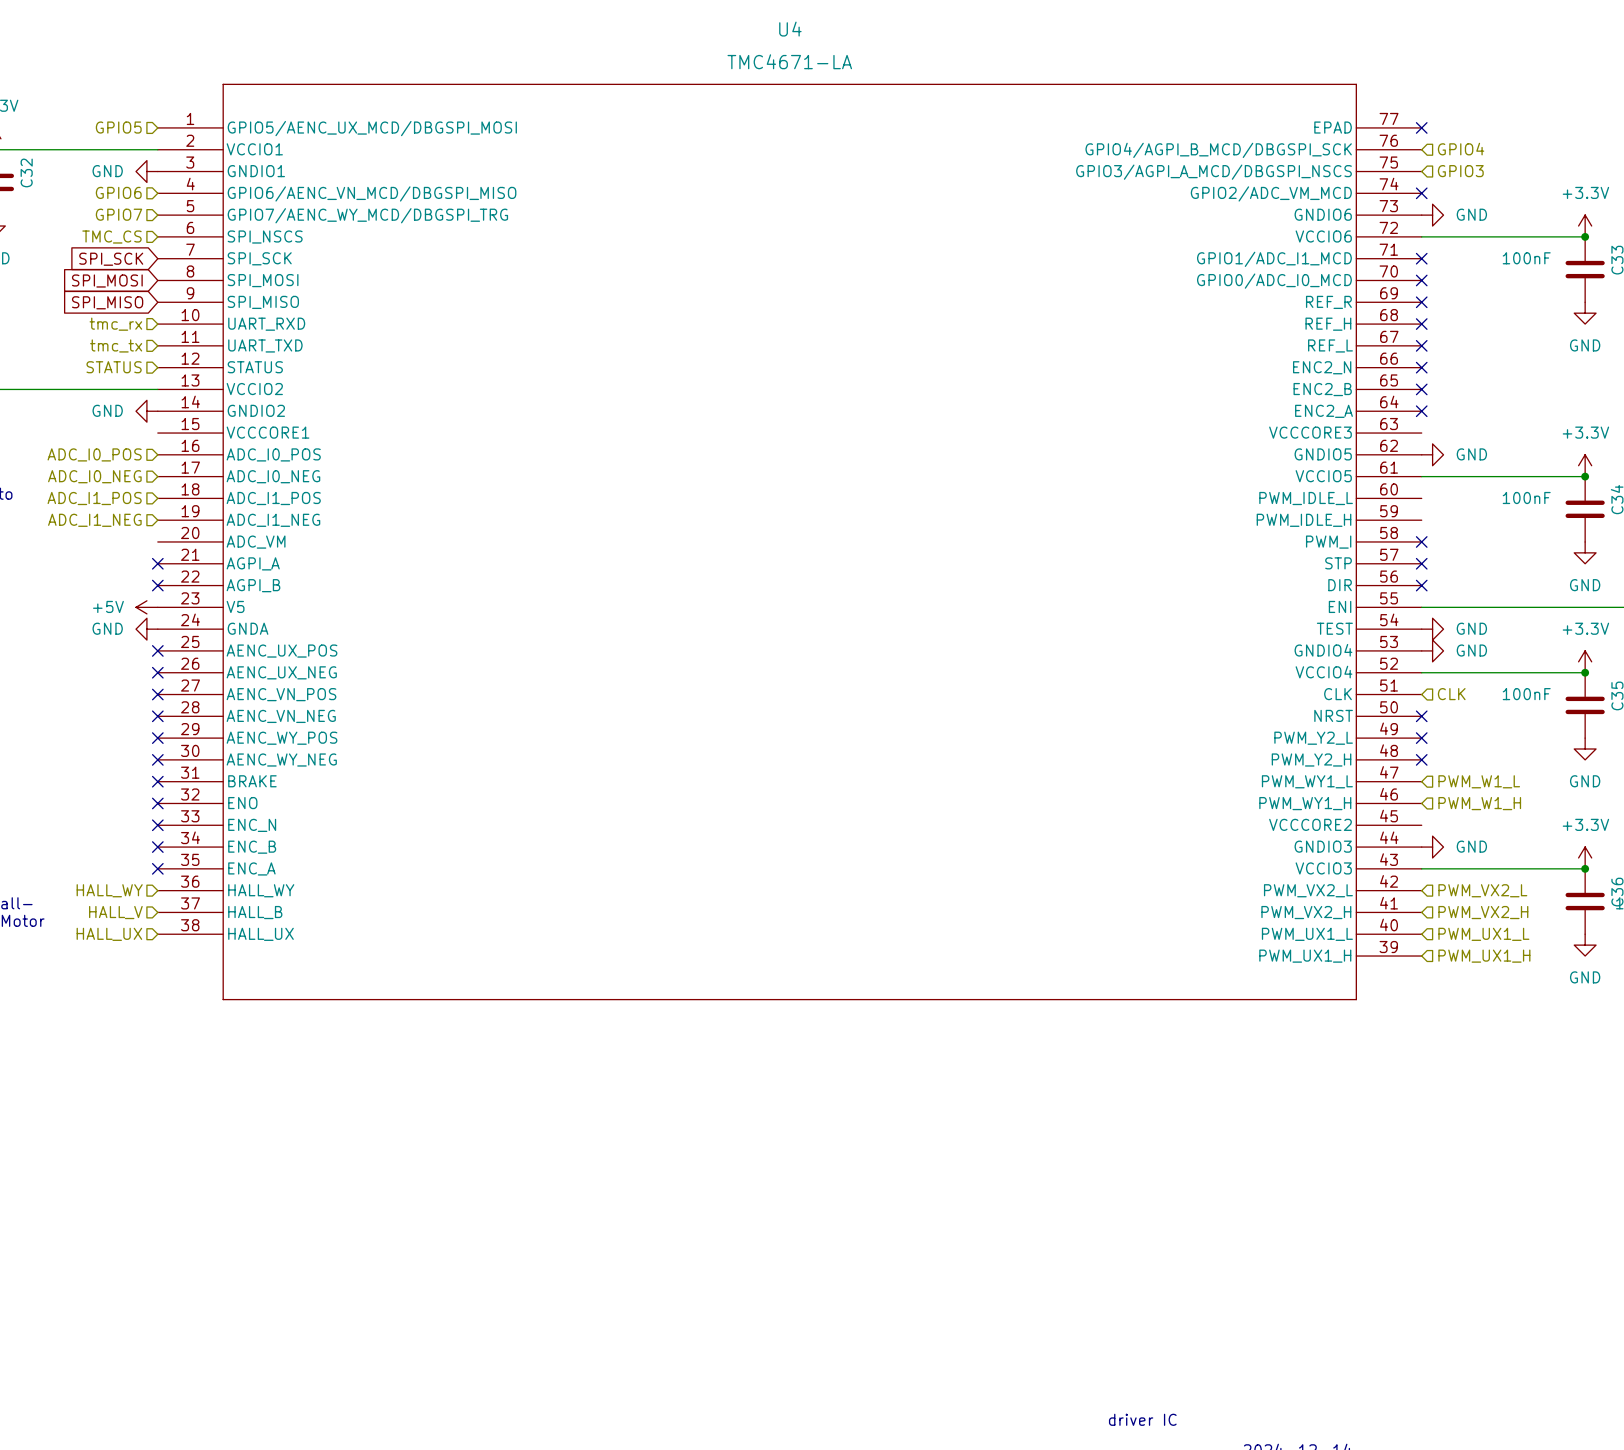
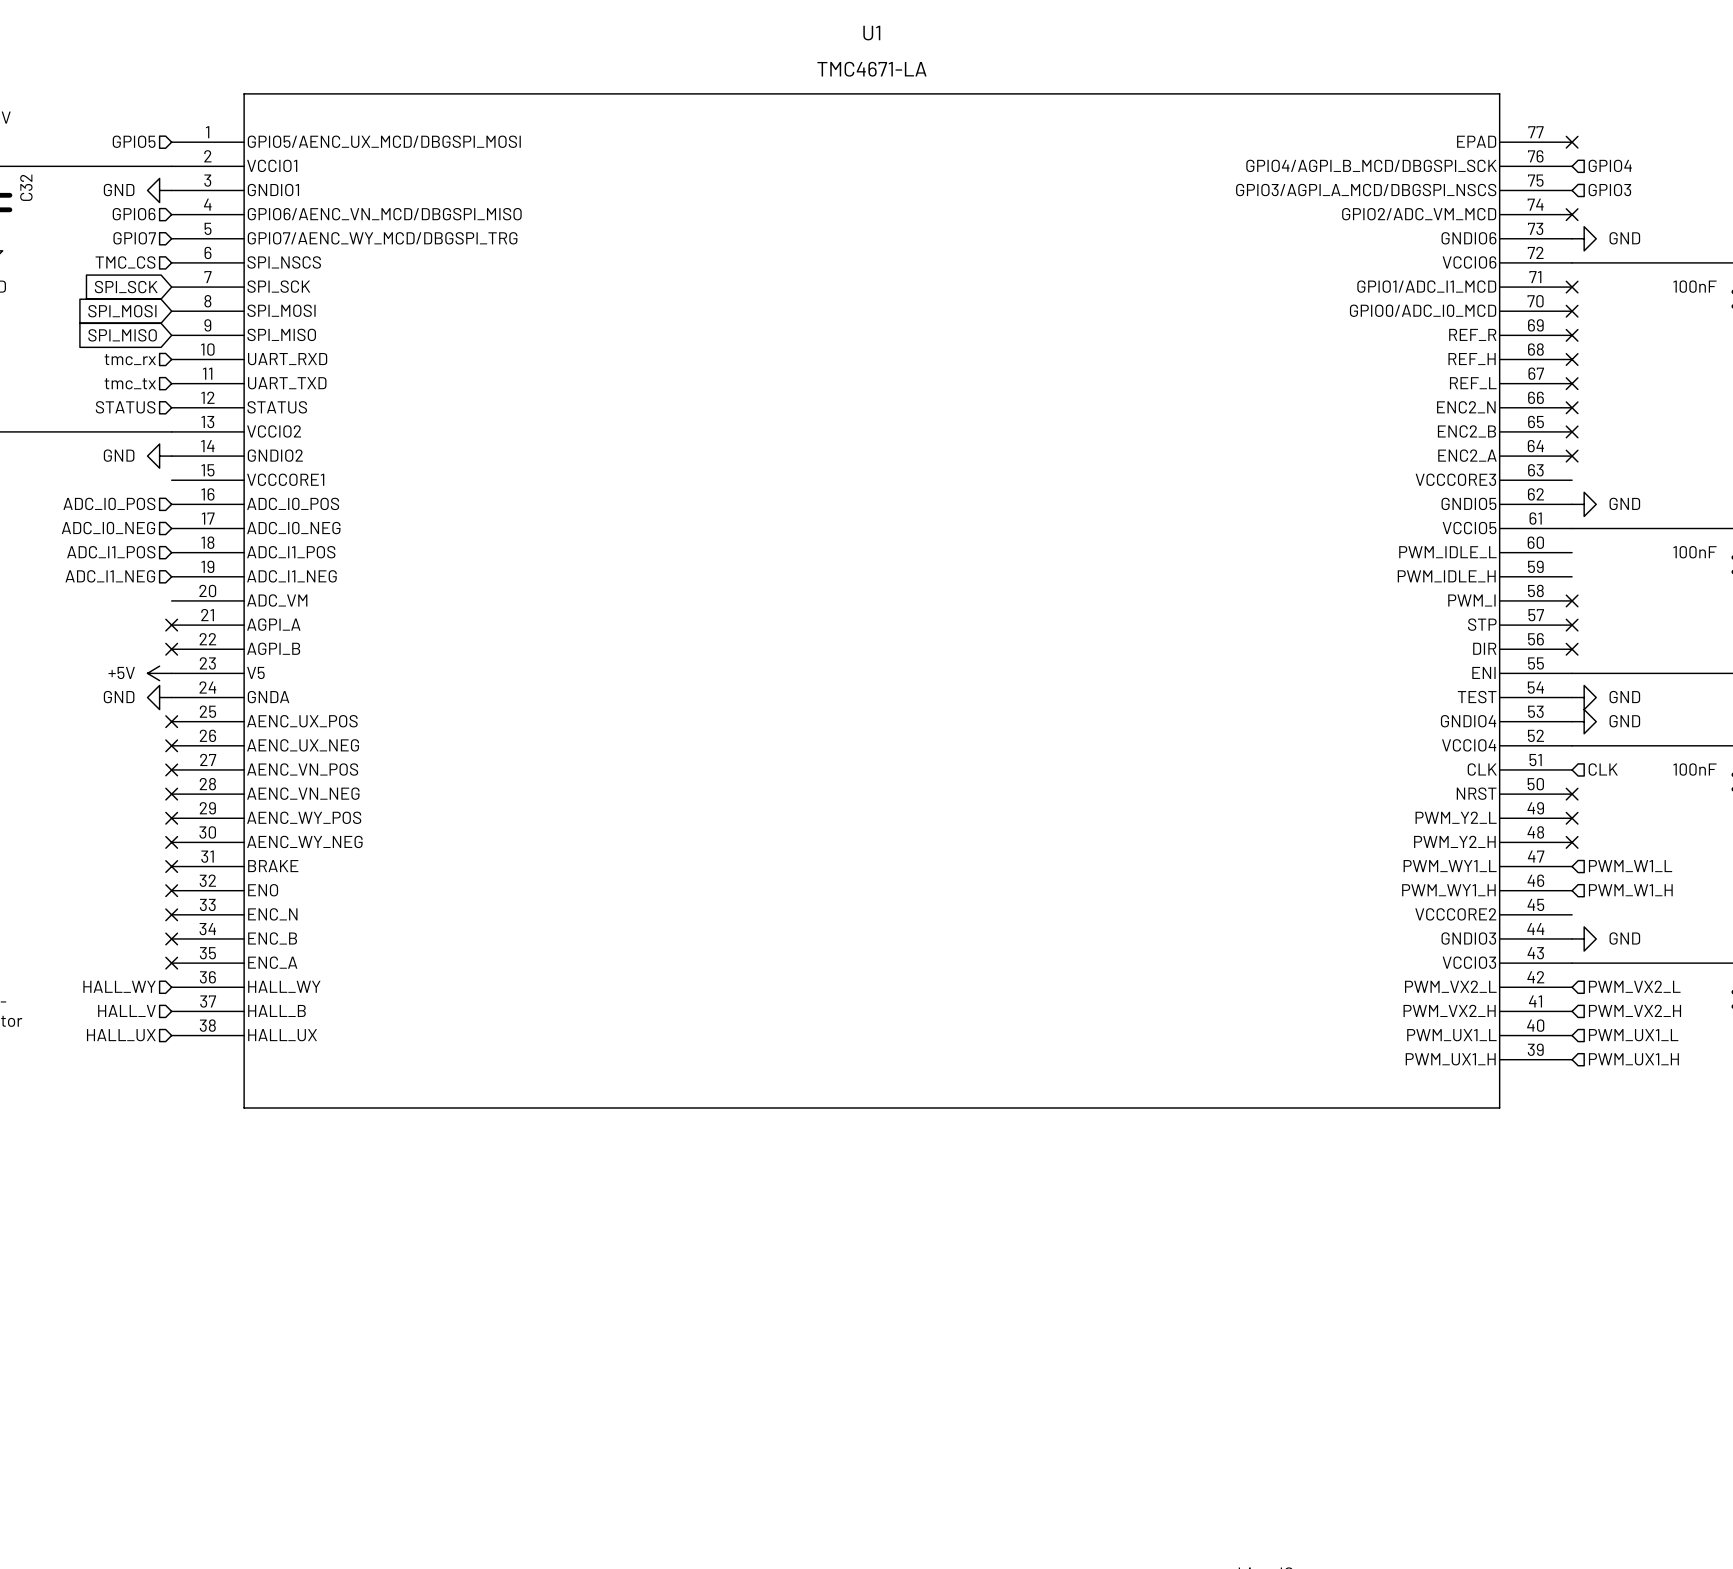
U4 name: U4 (790, 29) -> U1 (871, 33)

